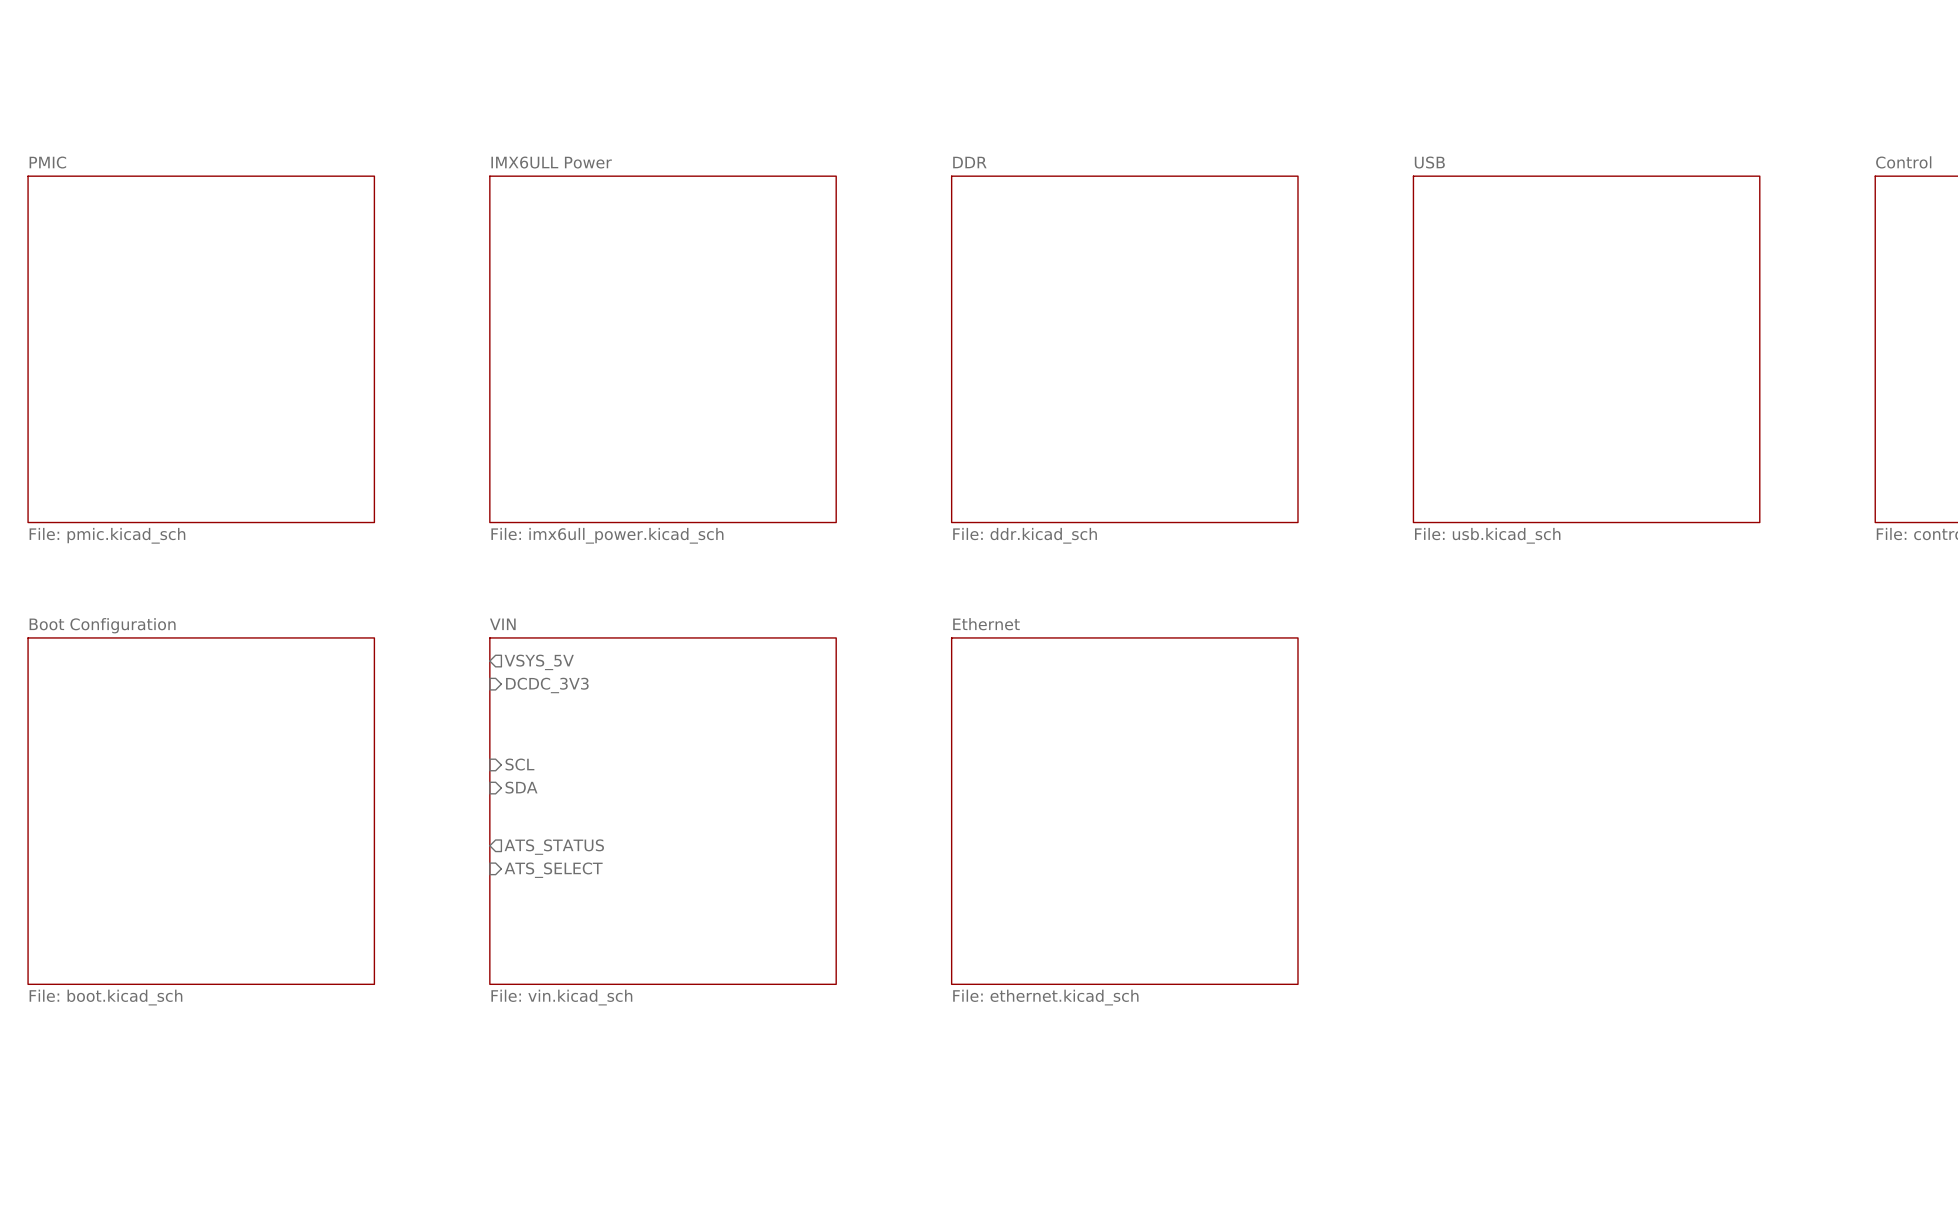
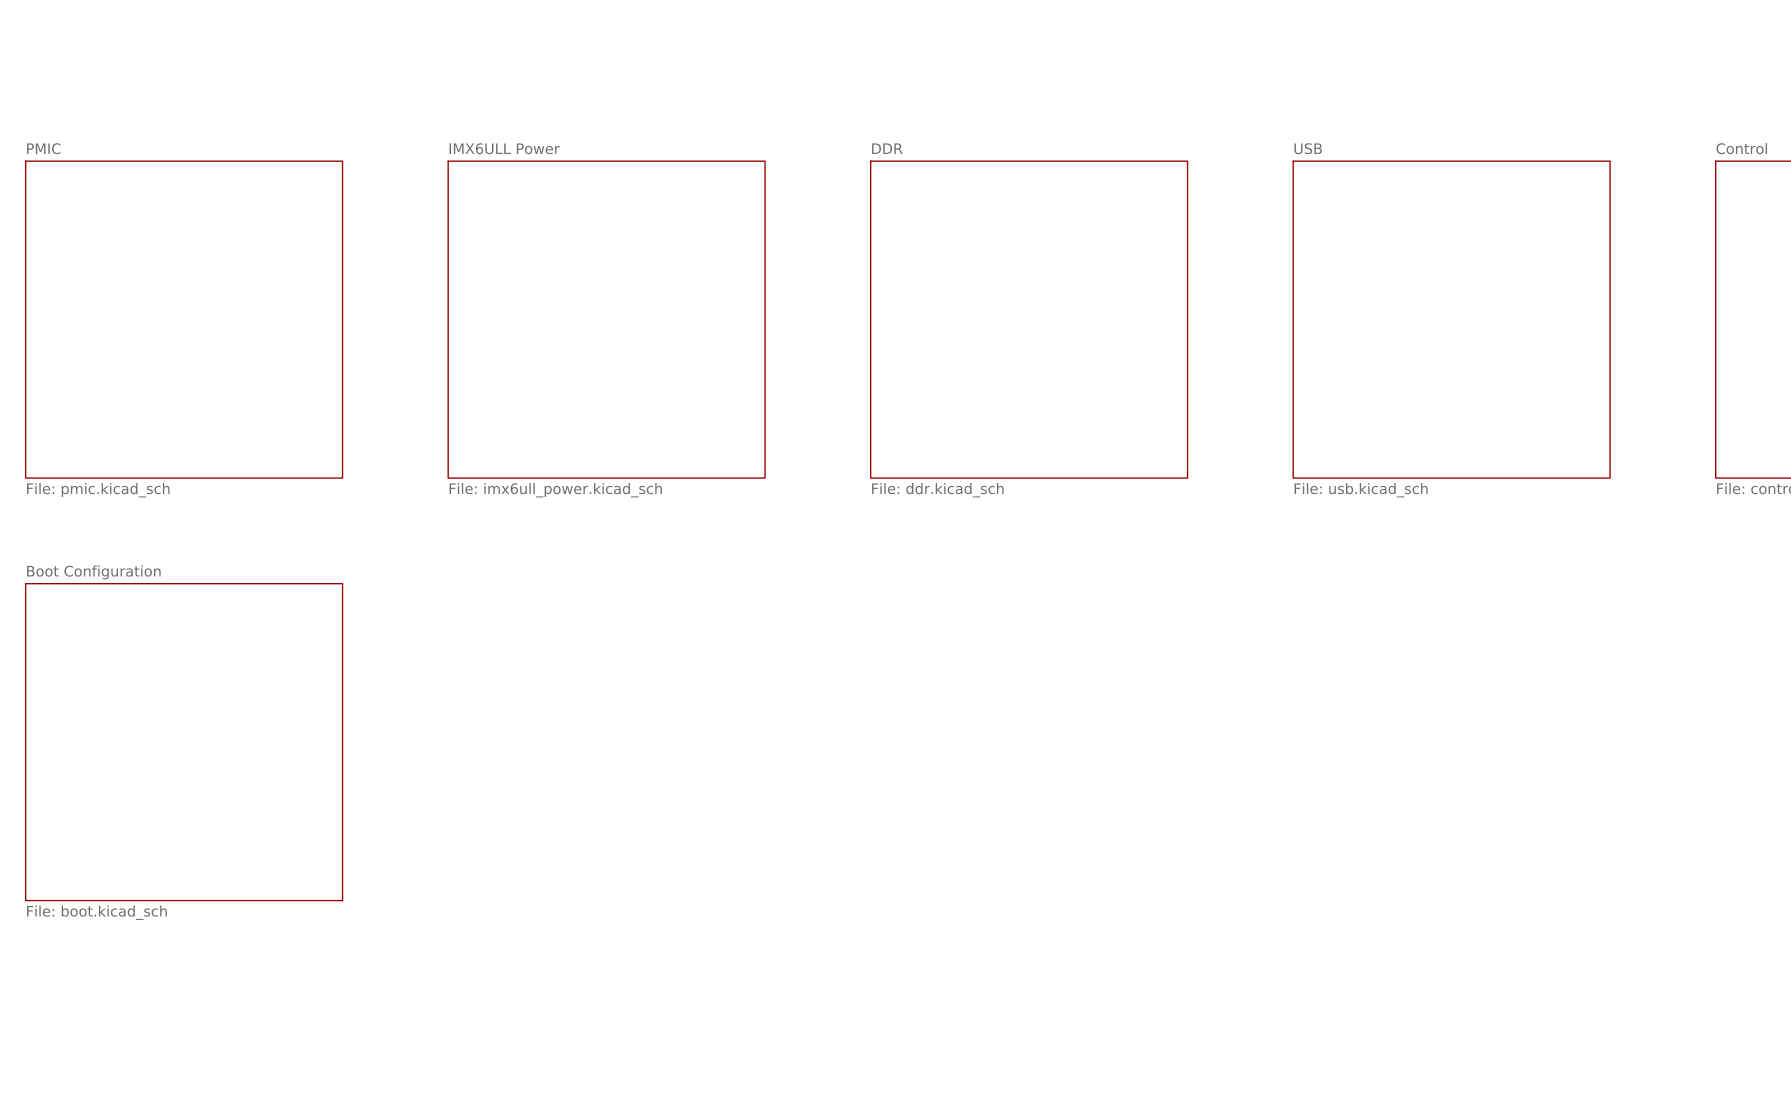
sheet pin: VSYS_5V (539, 662) -> none
sheet pin: DCDC_3V3 (547, 685) -> none
sheet pin: SCL (519, 764) -> none
sheet pin: SDA (521, 787) -> none
sheet VIN: File: vin.kicad_sch (663, 811) -> none
sheet Ethernet: File: ethernet.kicad_sch (1124, 811) -> none
sheet pin: ATS_STATUS (554, 847) -> none
sheet pin: ATS_SELECT (553, 870) -> none

